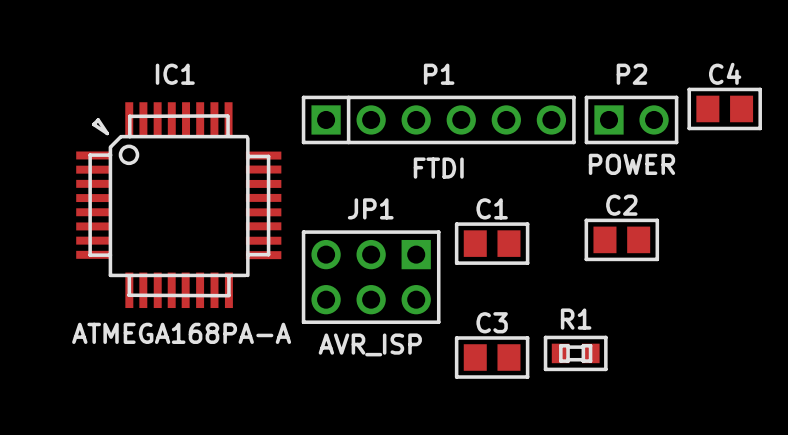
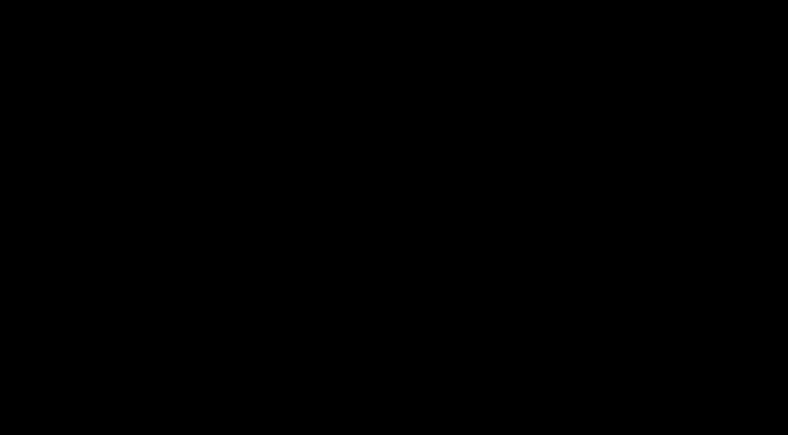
C4: (724, 108) -> none
P1: FTDI (438, 119) -> none
P2: POWER (631, 119) -> none
IC1: ATMEGA168PA-A (178, 205) -> none
C2: (621, 239) -> none
C1: (492, 243) -> none
JP1: AVR_ISP (371, 277) -> none
R1: (575, 353) -> none
C3: (492, 357) -> none

